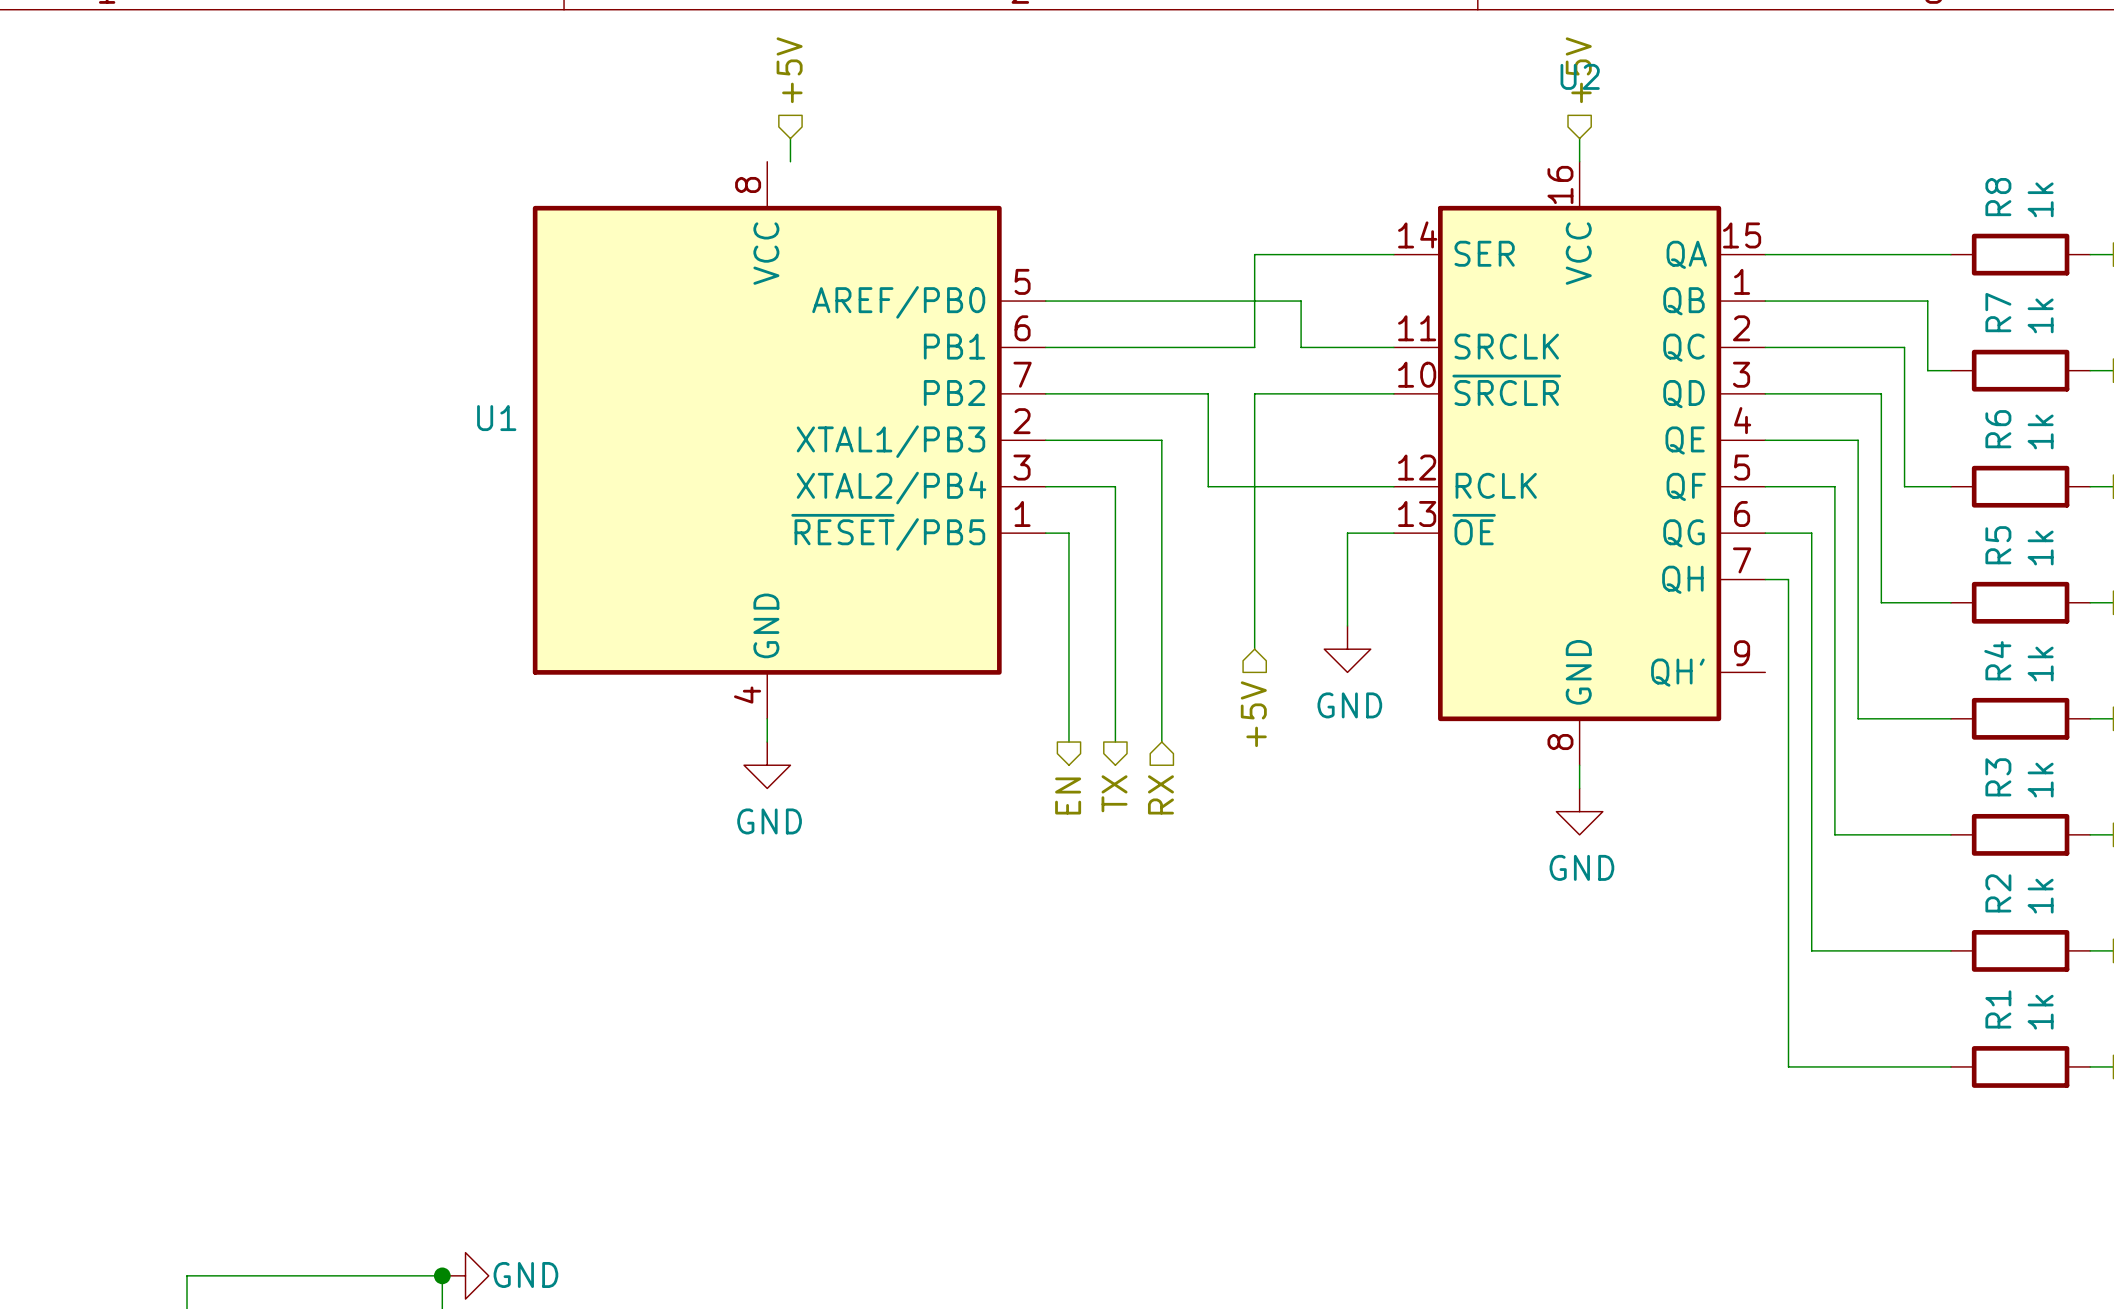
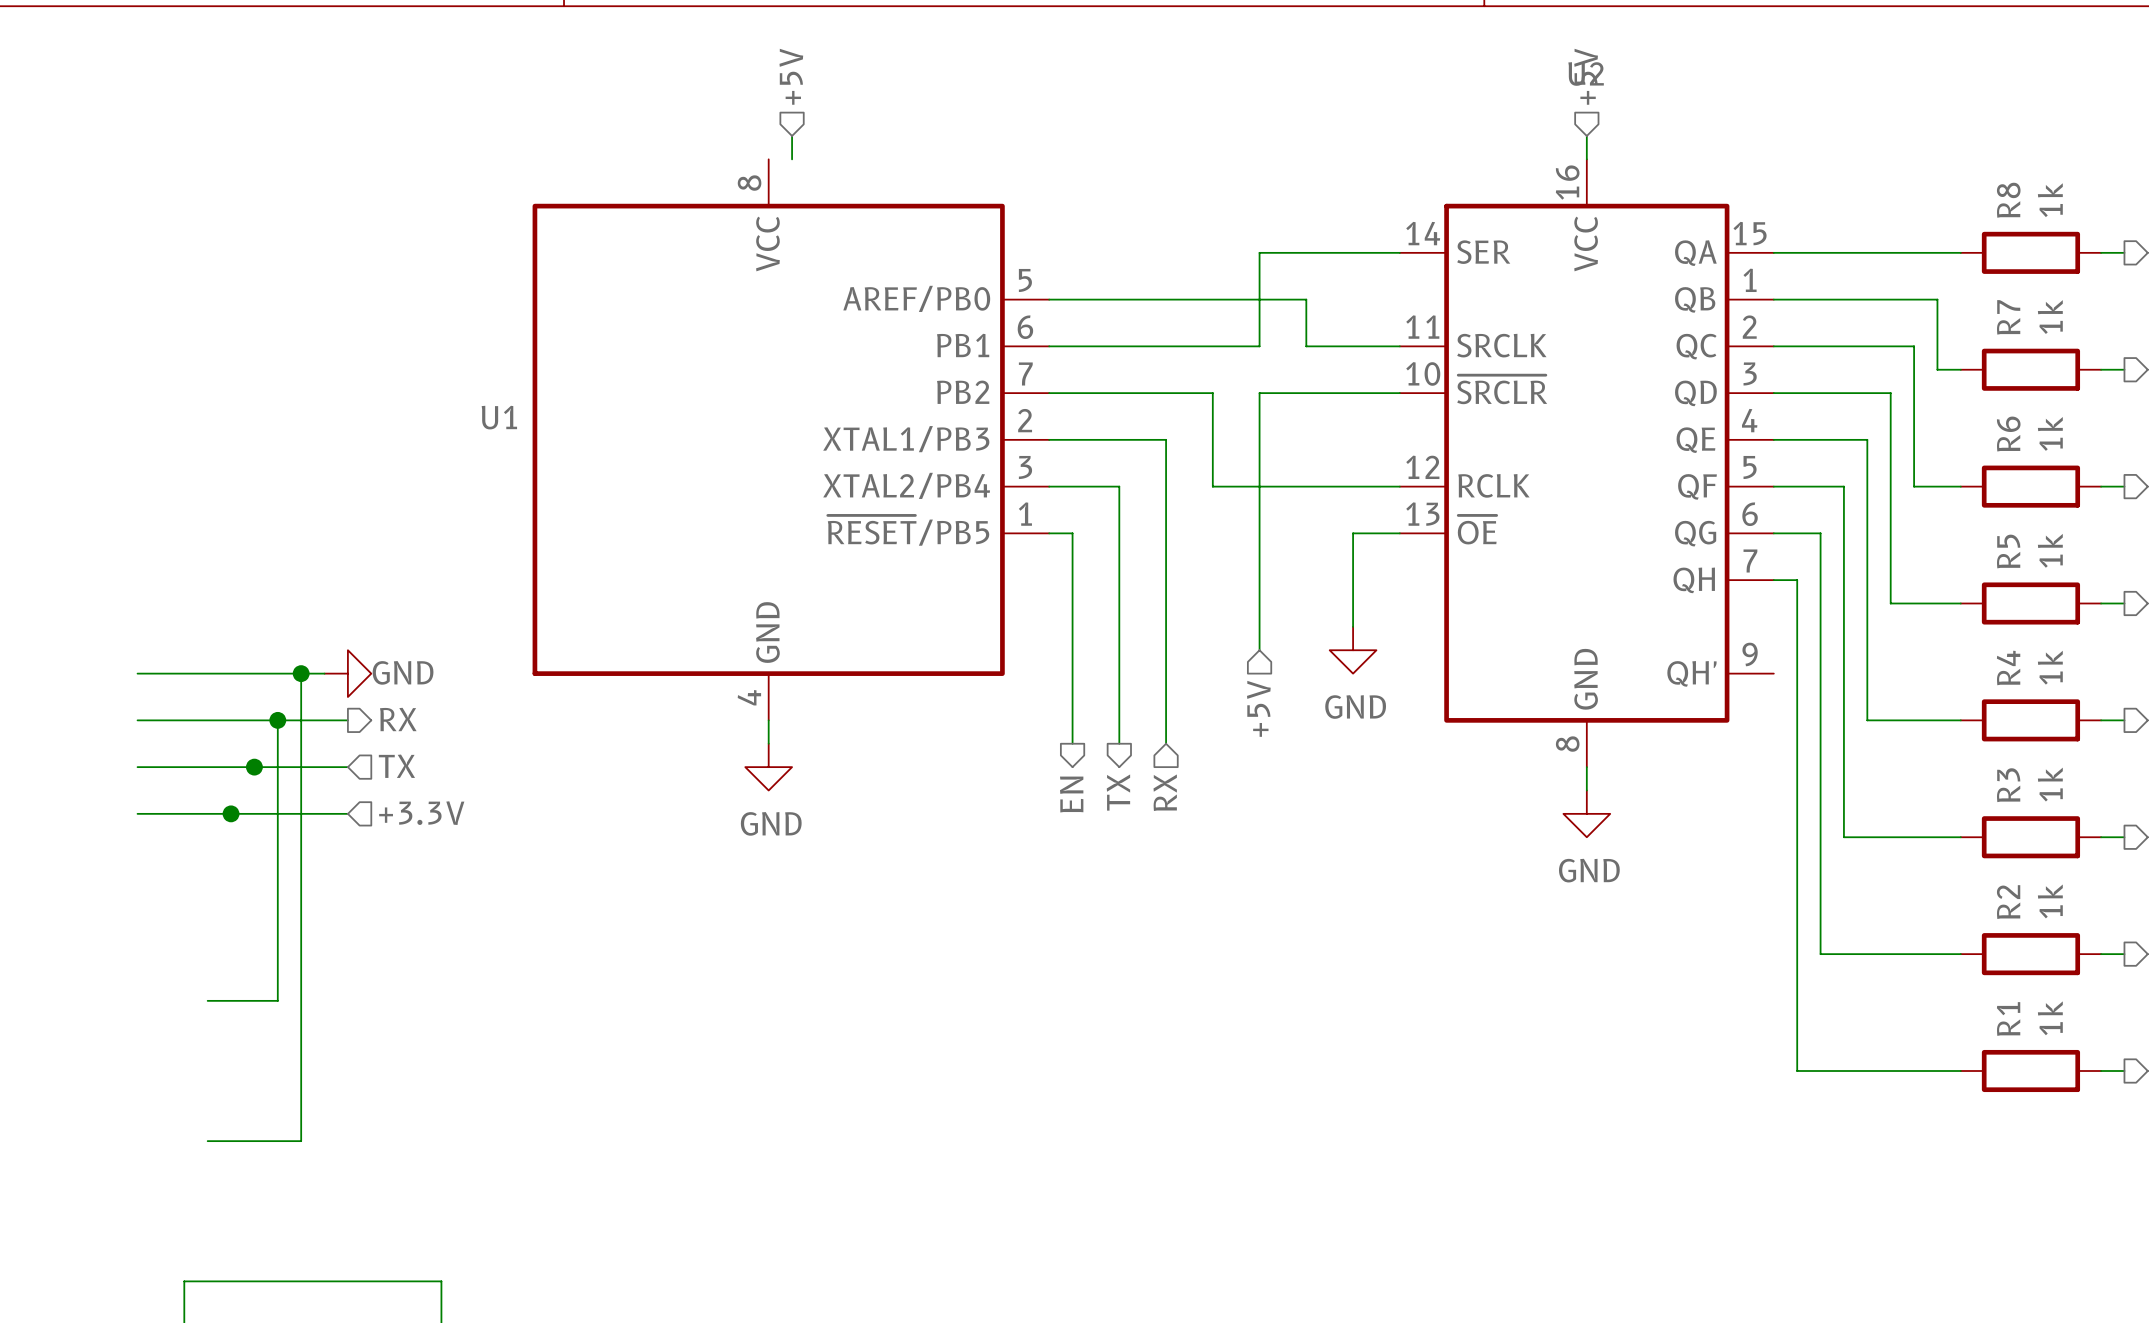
wire: none -> (137, 673) (324, 673)
wire: none -> (301, 673) (301, 1141) (207, 1141)
junction: none -> (301, 673)
power symbol: none -> GND (347, 673)
hierarchical label: none -> RX (398, 719)
wire: none -> (137, 720) (347, 720)
wire: none -> (277, 720) (277, 1000) (207, 1000)
junction: none -> (277, 720)
hierarchical label: none -> TX (396, 766)
wire: none -> (137, 767) (347, 767)
junction: none -> (254, 767)
hierarchical label: none -> +3.3V (421, 813)
wire: none -> (137, 813) (347, 813)
junction: none -> (231, 813)
junction: (442, 1275) -> none
power symbol: GND (465, 1275) -> none

